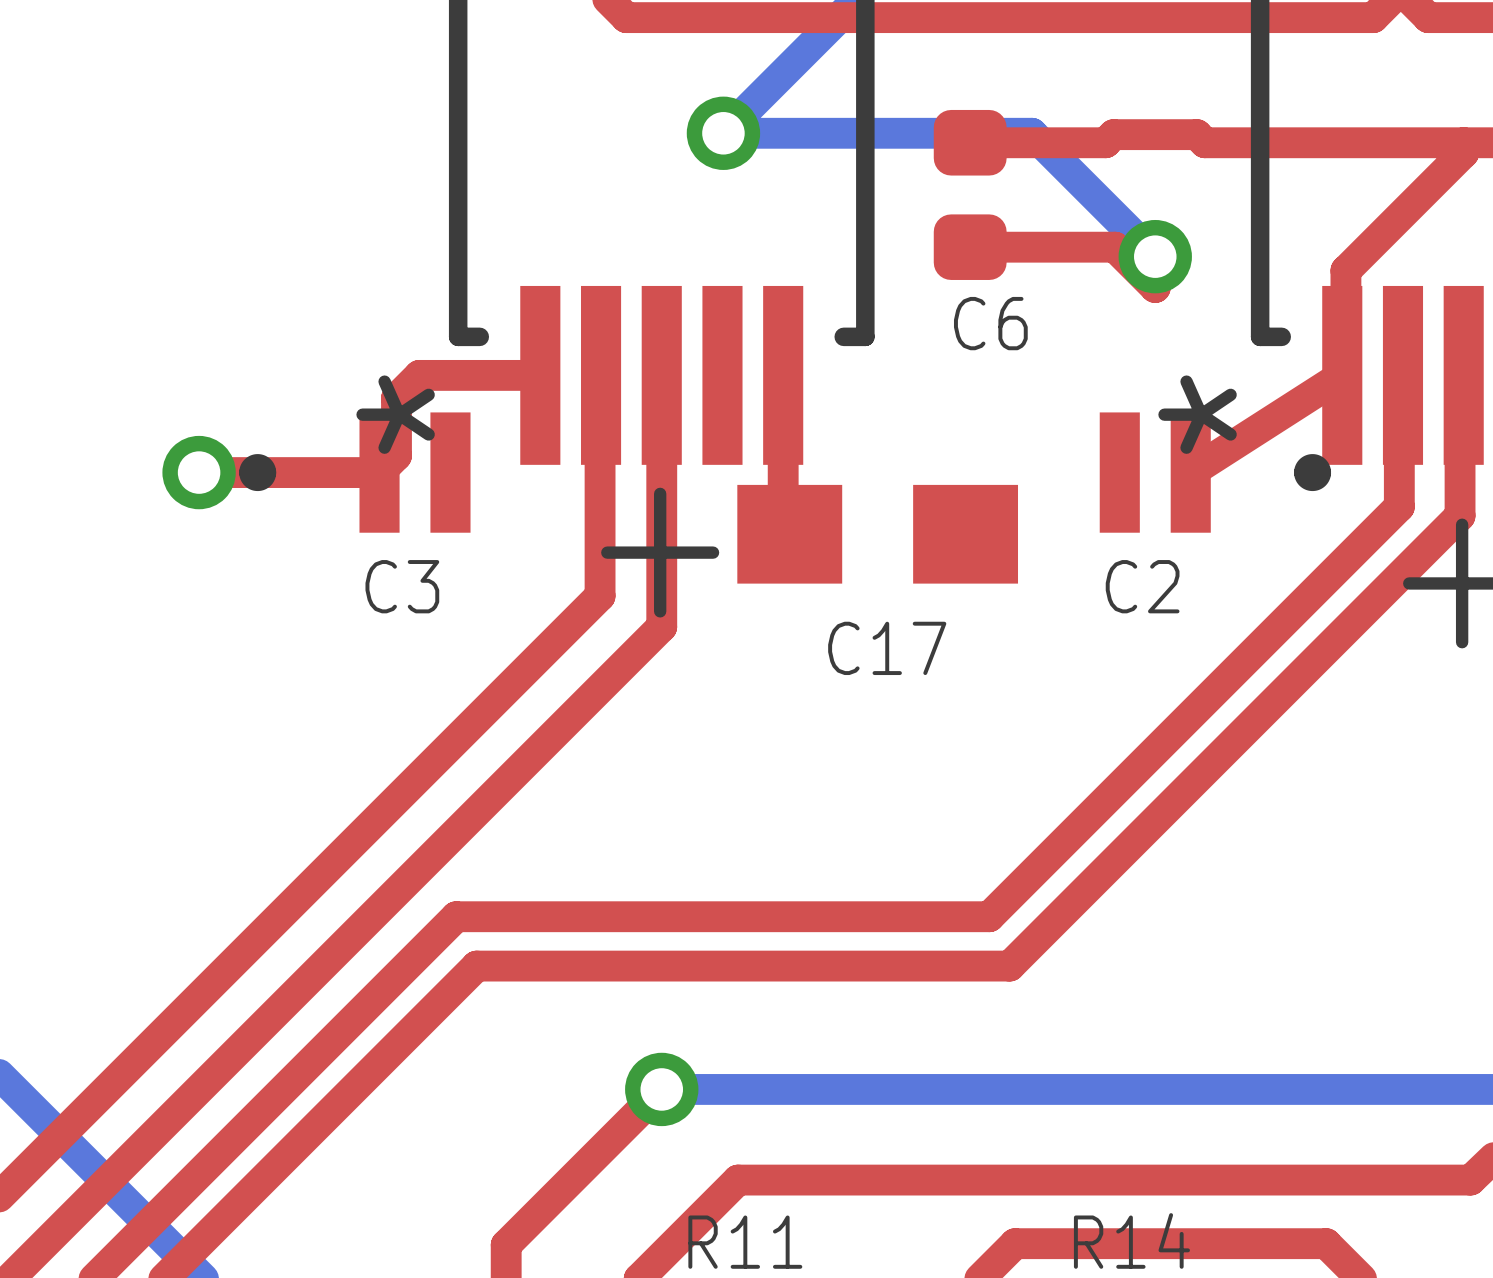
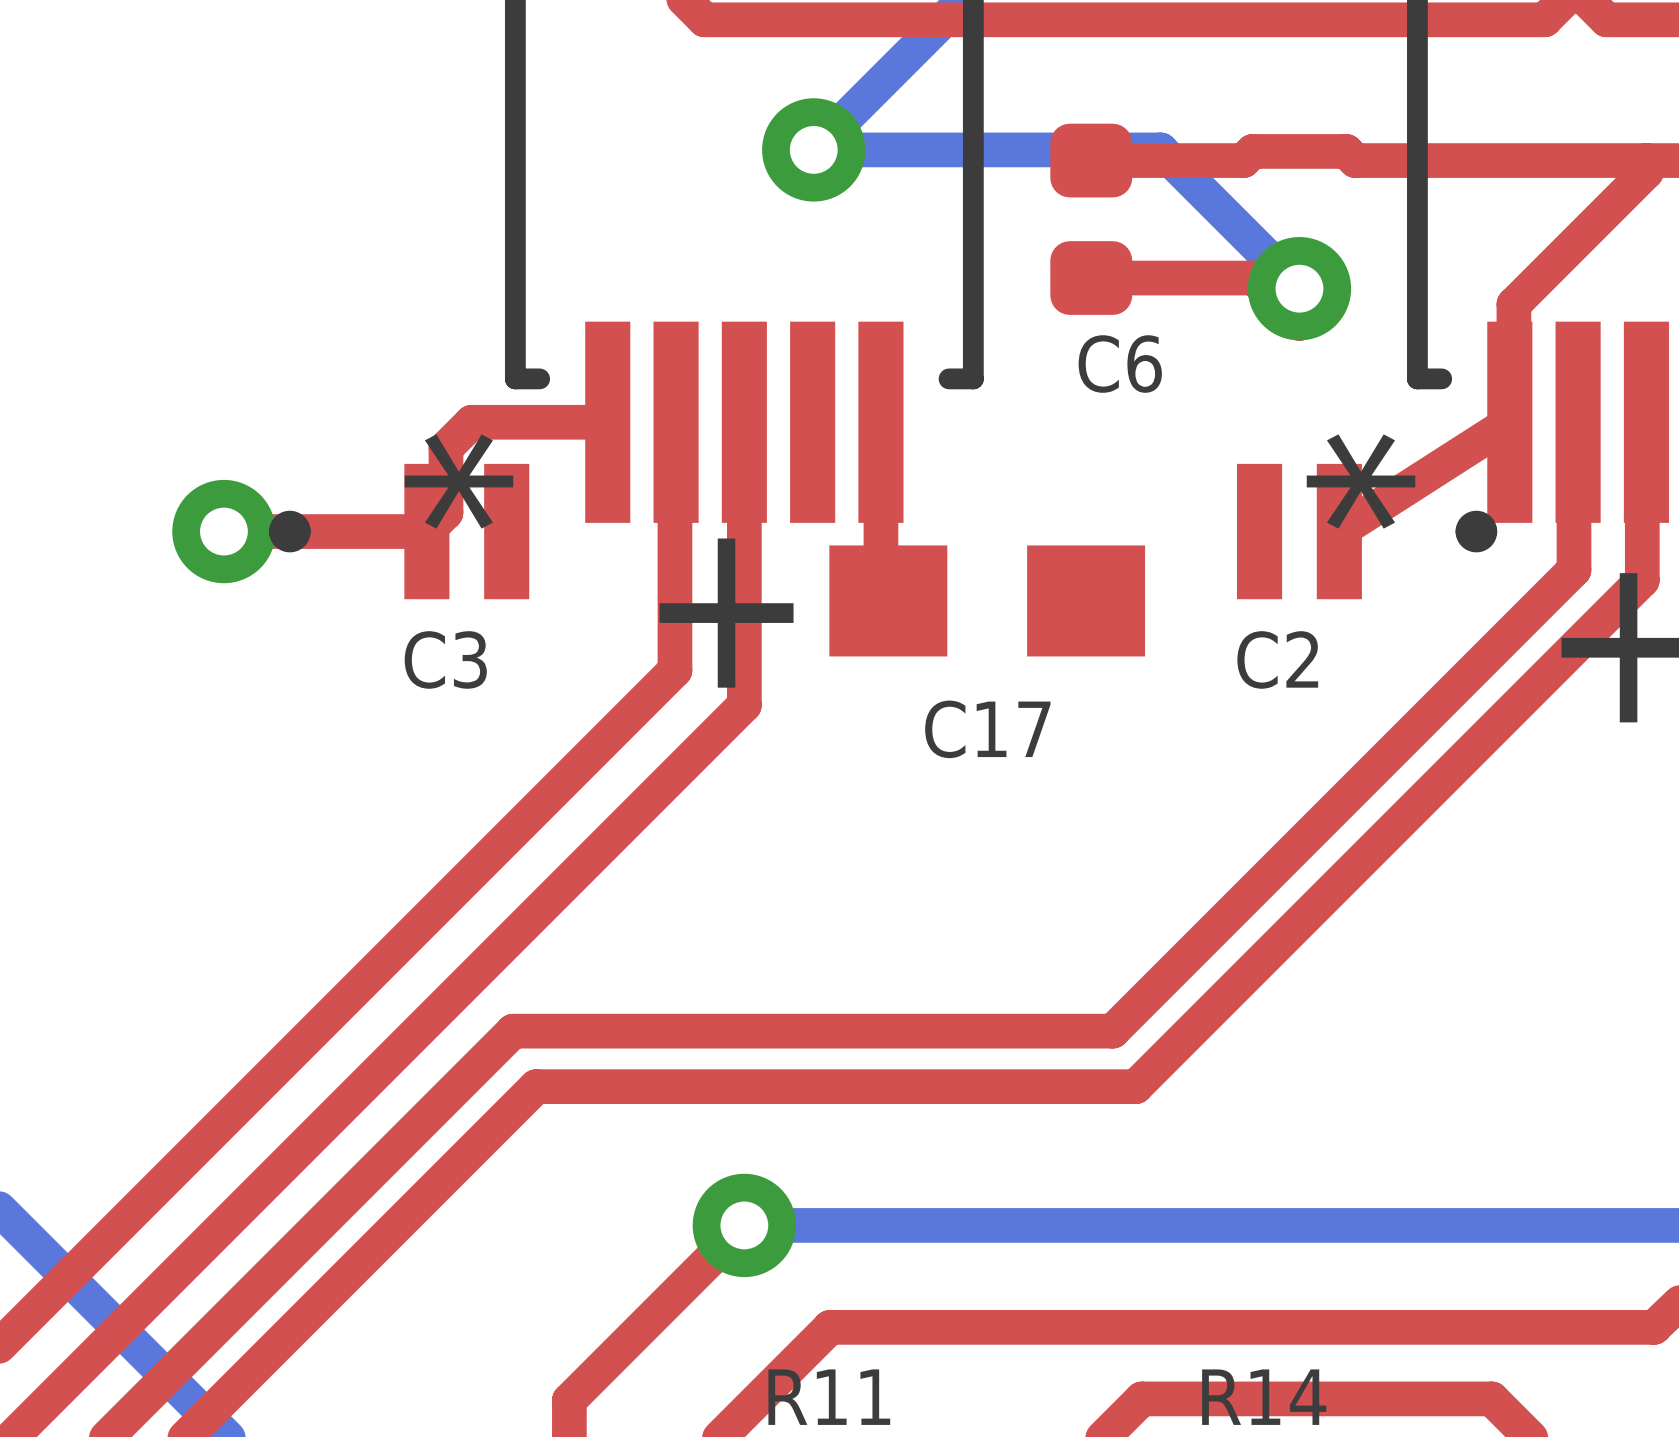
via size: [686, 96, 761, 170] -> [762, 98, 866, 202]
via size: [1118, 219, 1192, 294] -> [1247, 237, 1352, 341]
via size: [162, 435, 236, 510] -> [172, 479, 276, 584]
via size: [625, 1052, 699, 1127] -> [692, 1173, 797, 1278]

